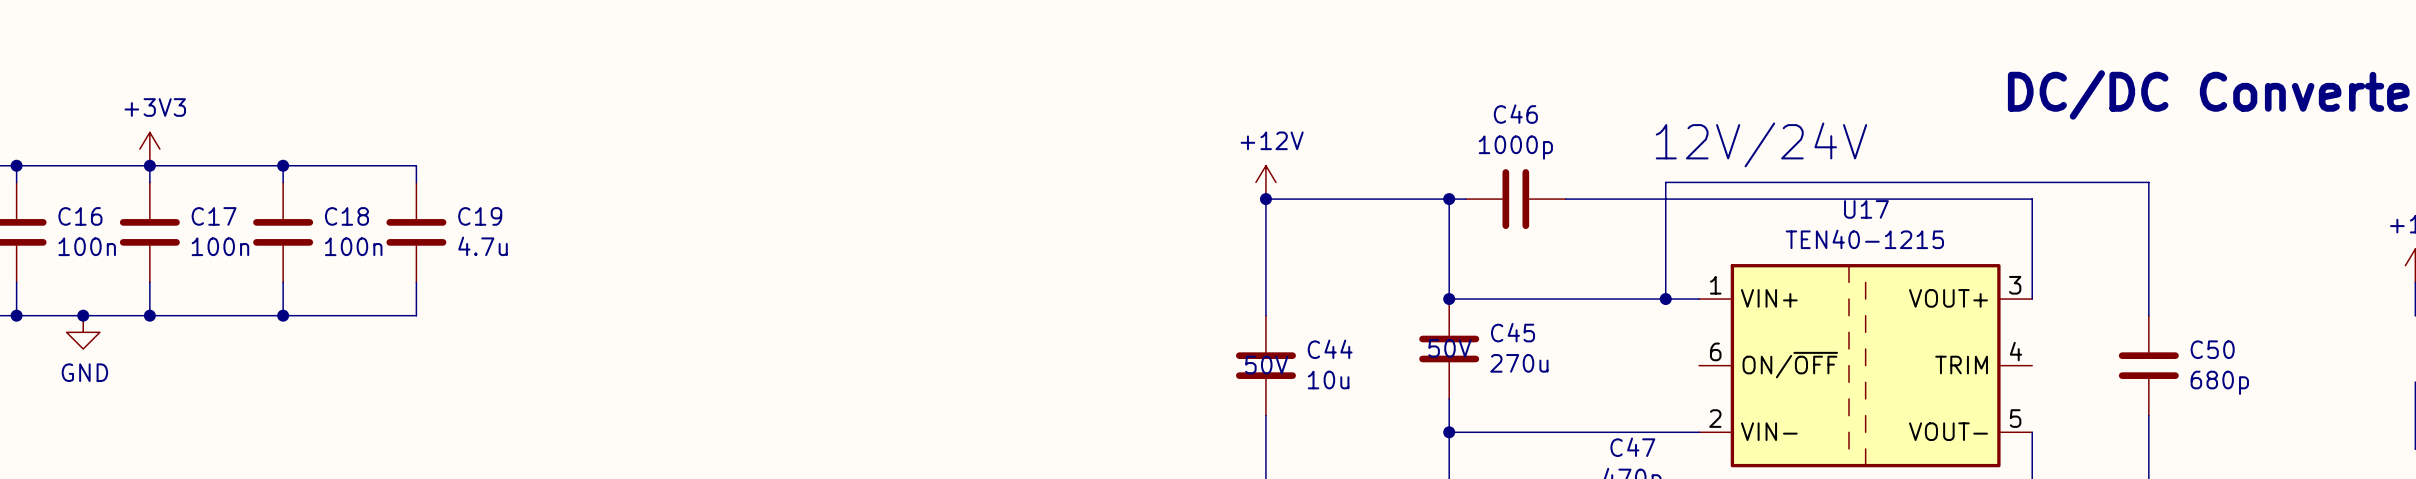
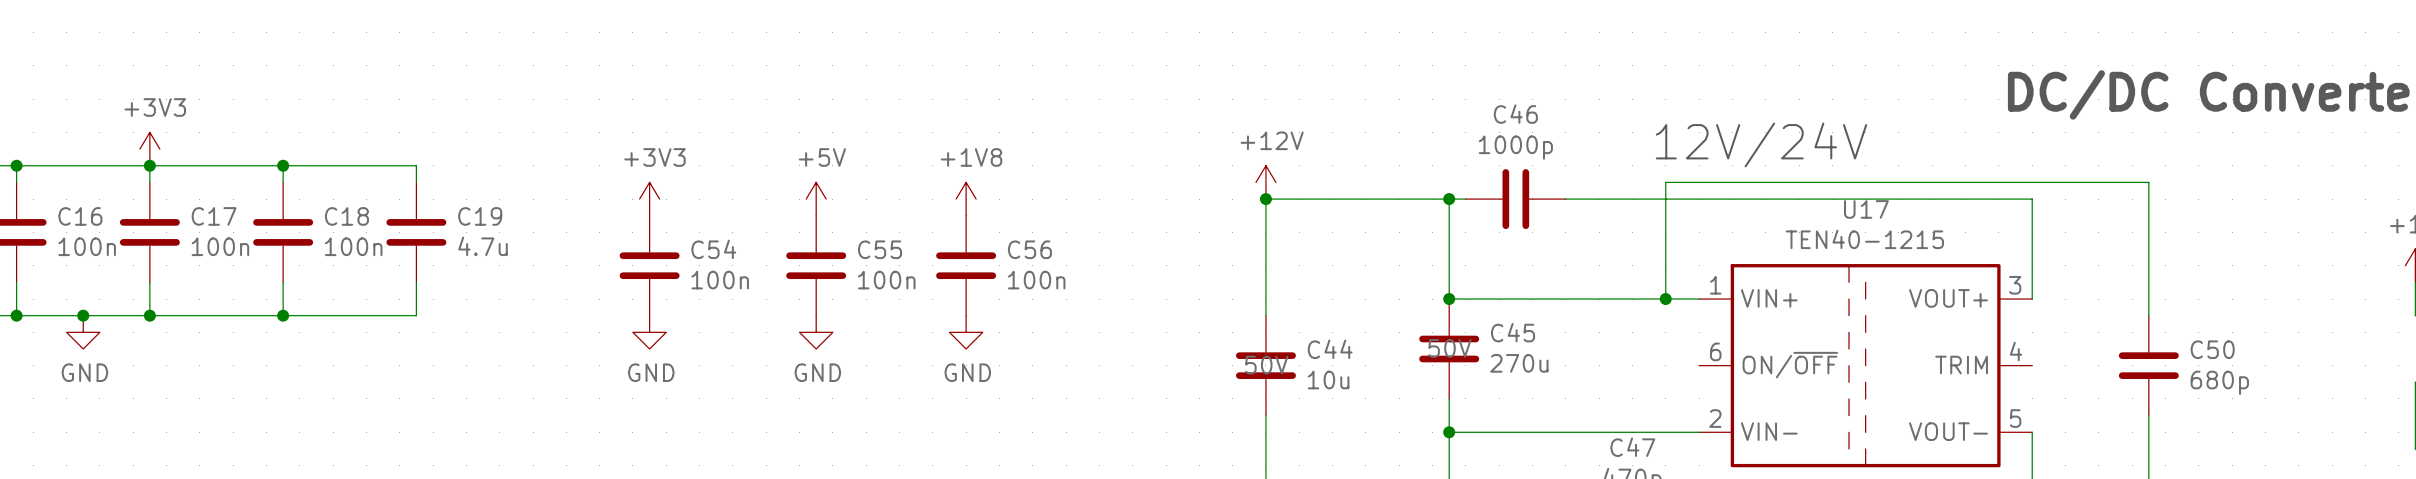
power symbol: none -> +3V3 (649, 199)
power symbol: none -> +5V (816, 199)
power symbol: none -> +1V8 (966, 199)
C54: none -> 100n (649, 265)
C55: none -> 100n (816, 265)
C56: none -> 100n (966, 265)
power symbol: none -> GND (649, 332)
power symbol: none -> GND (816, 332)
power symbol: none -> GND (966, 332)

